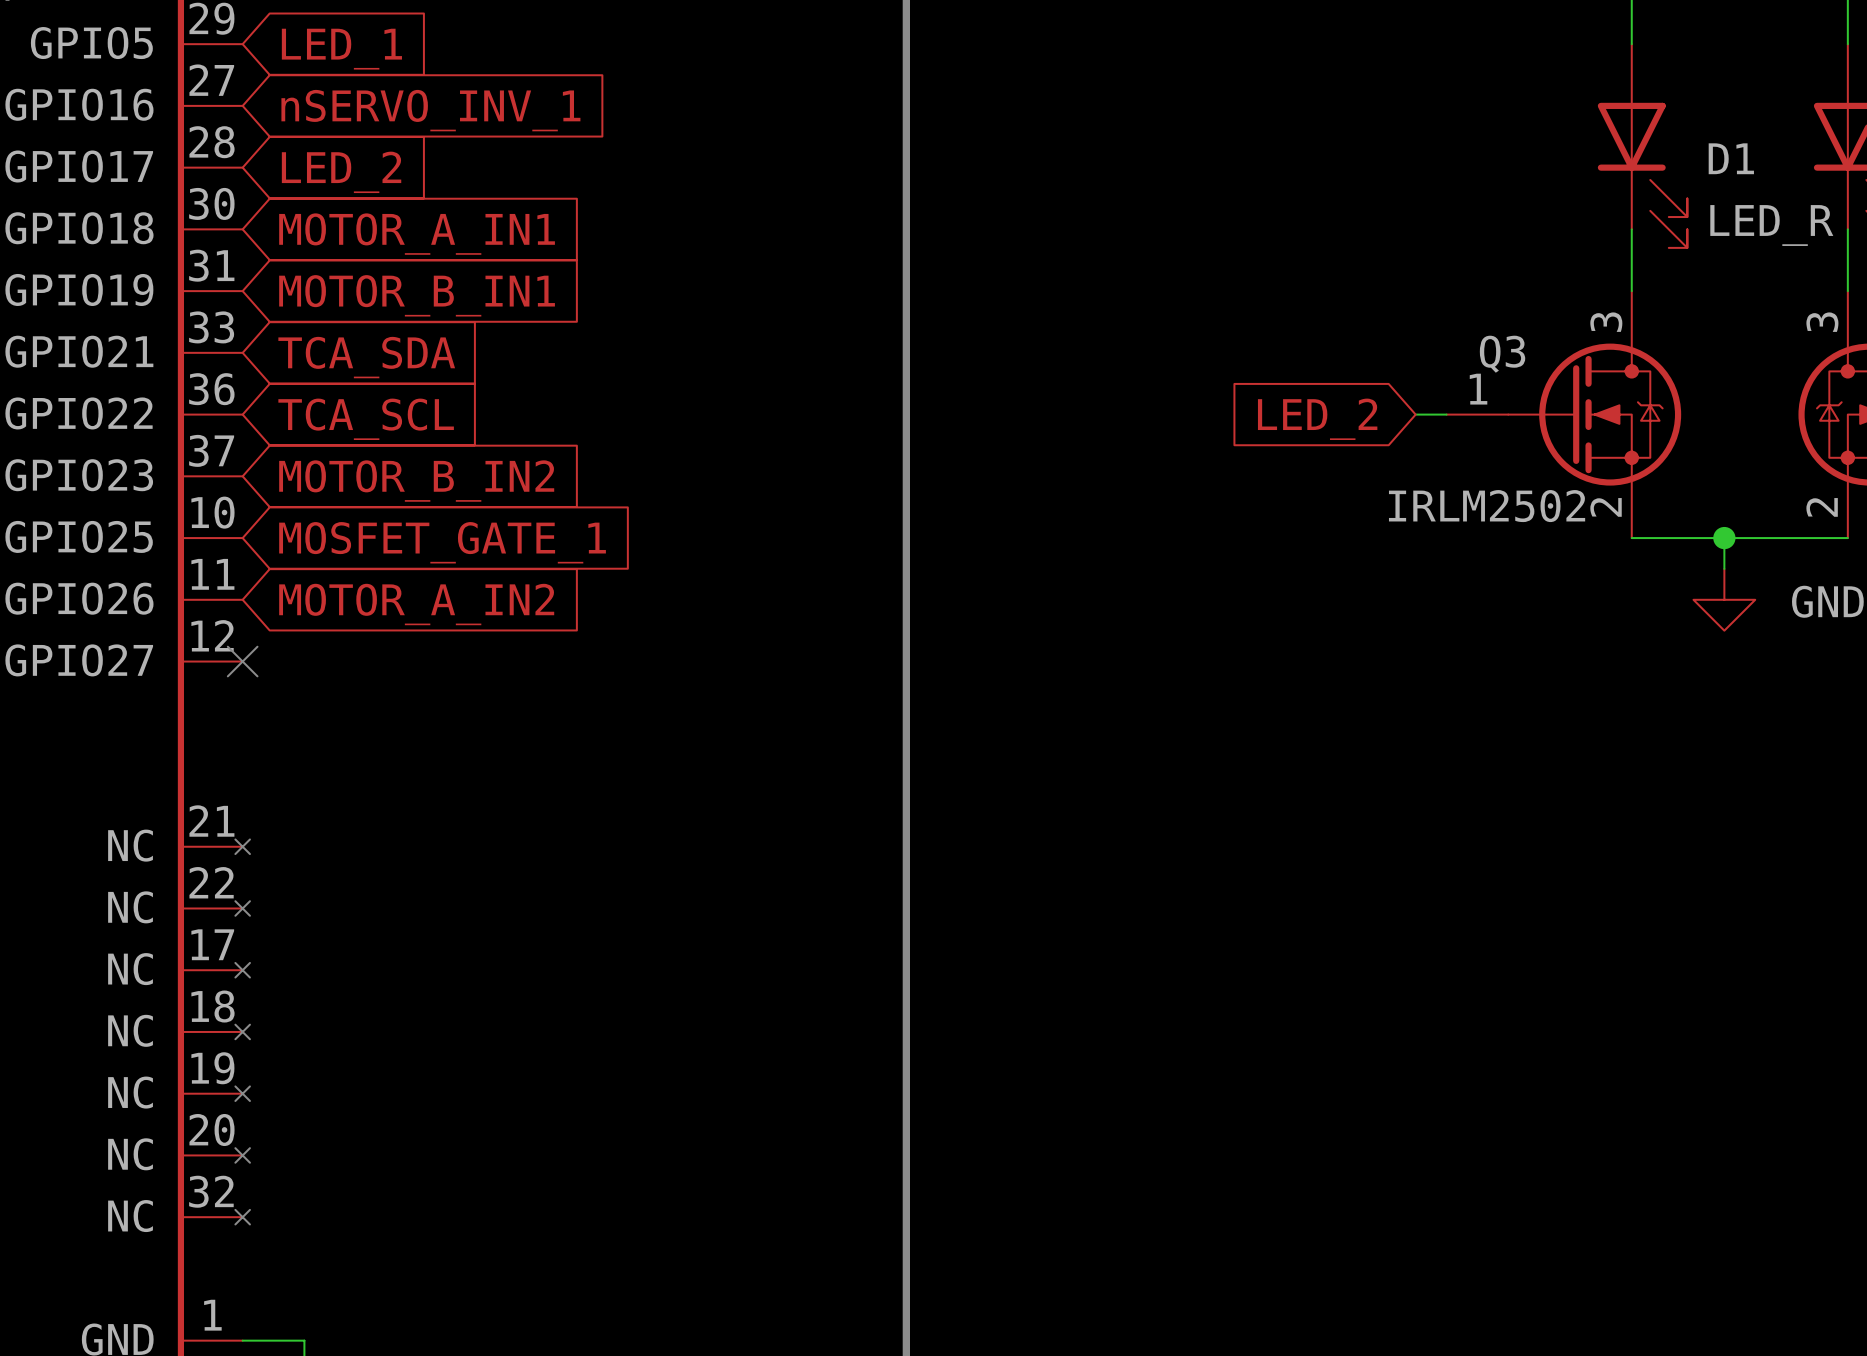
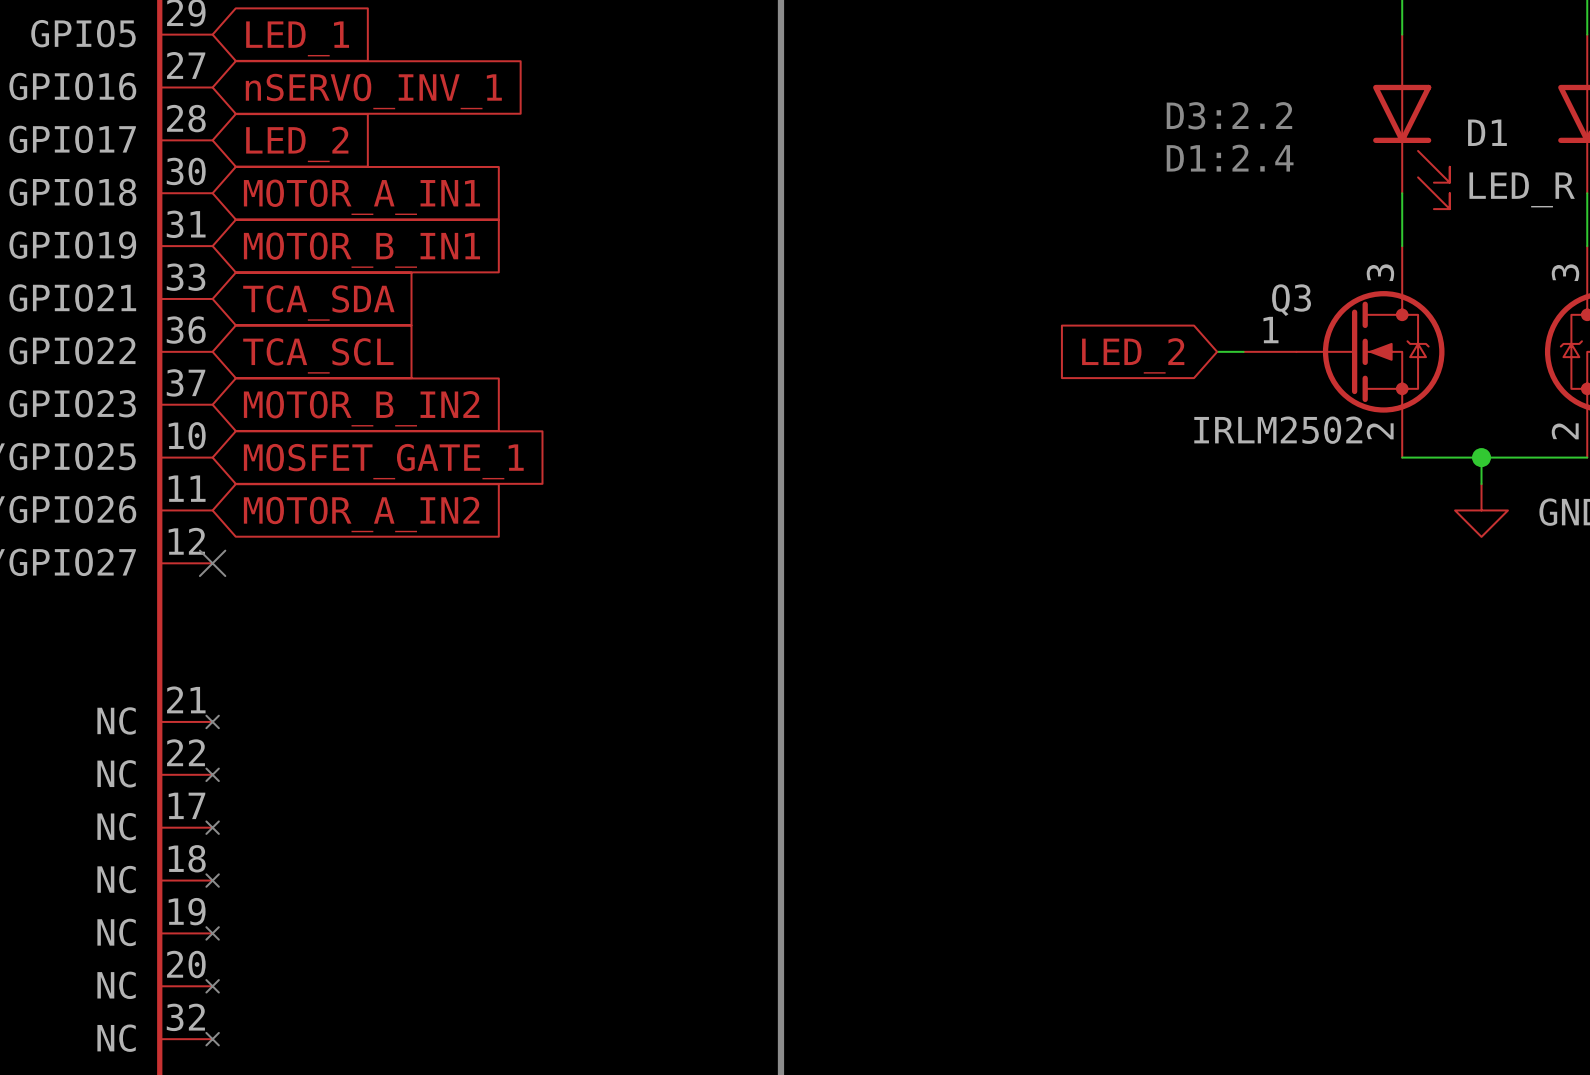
text: none -> D3:2.2 (1229, 115)
text: none -> D1:2.4 (1230, 158)

